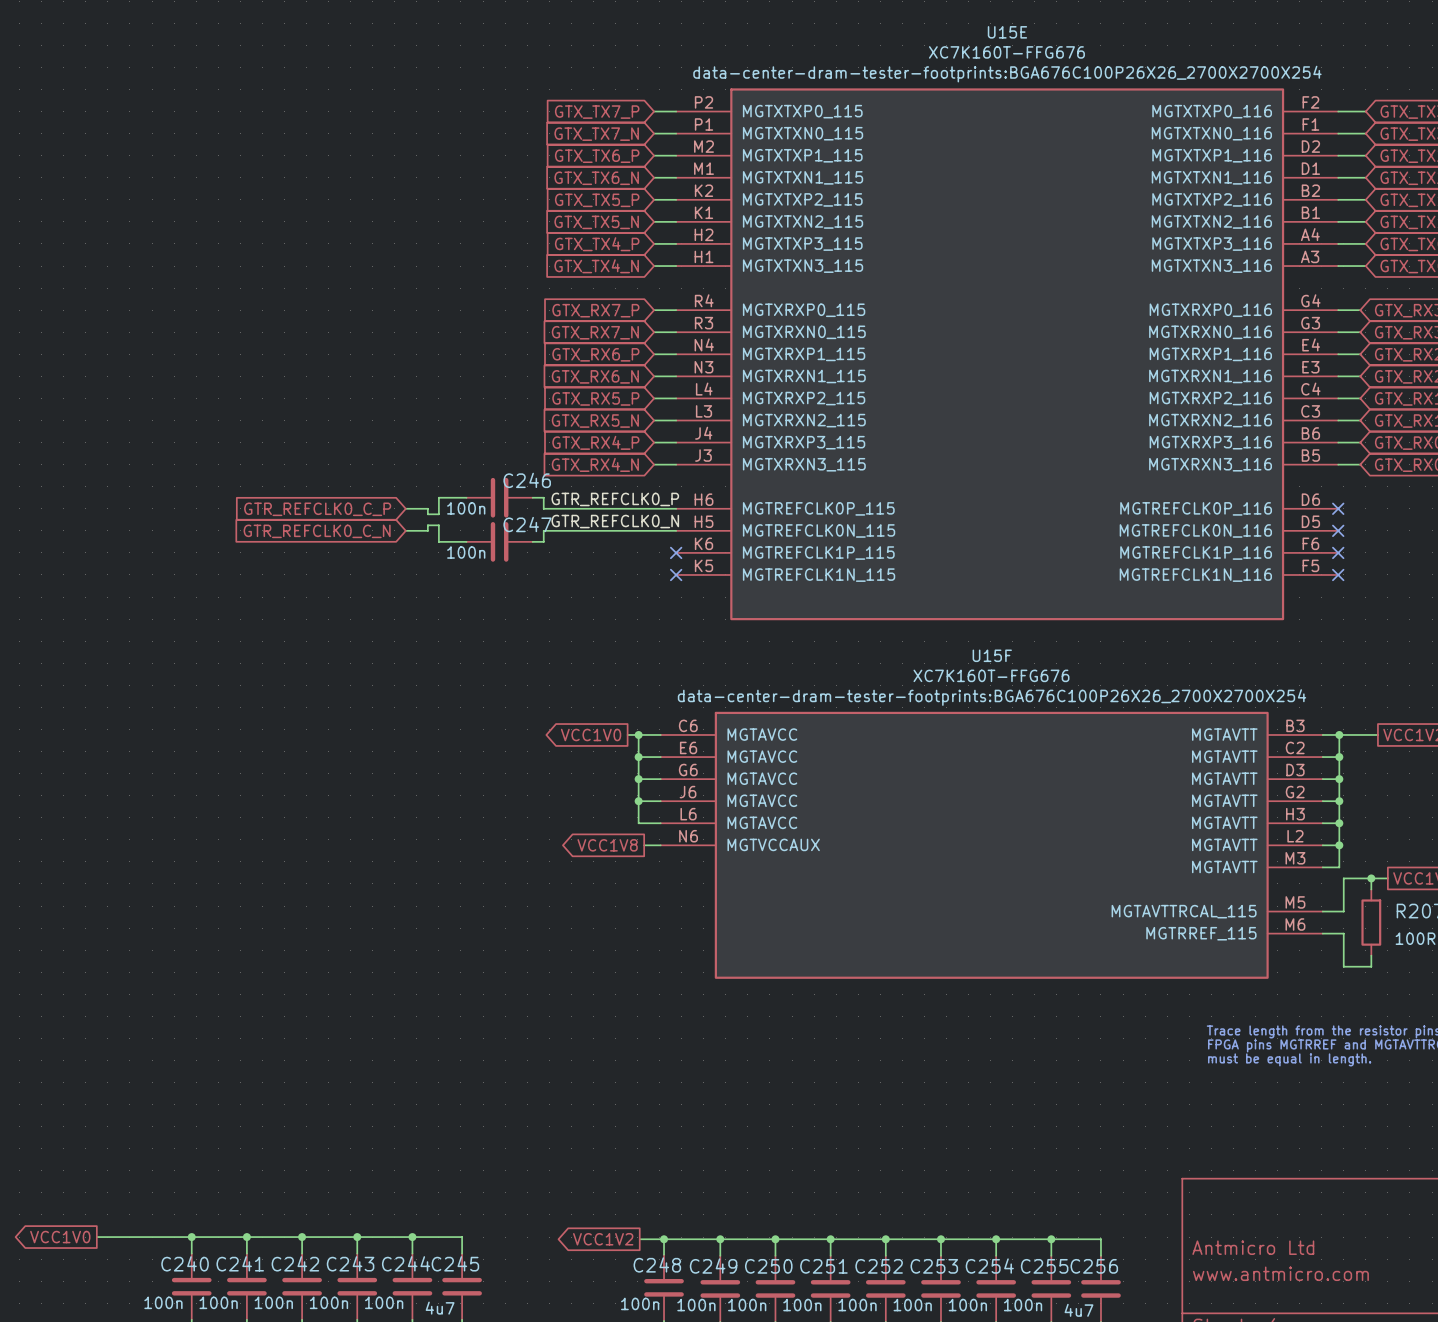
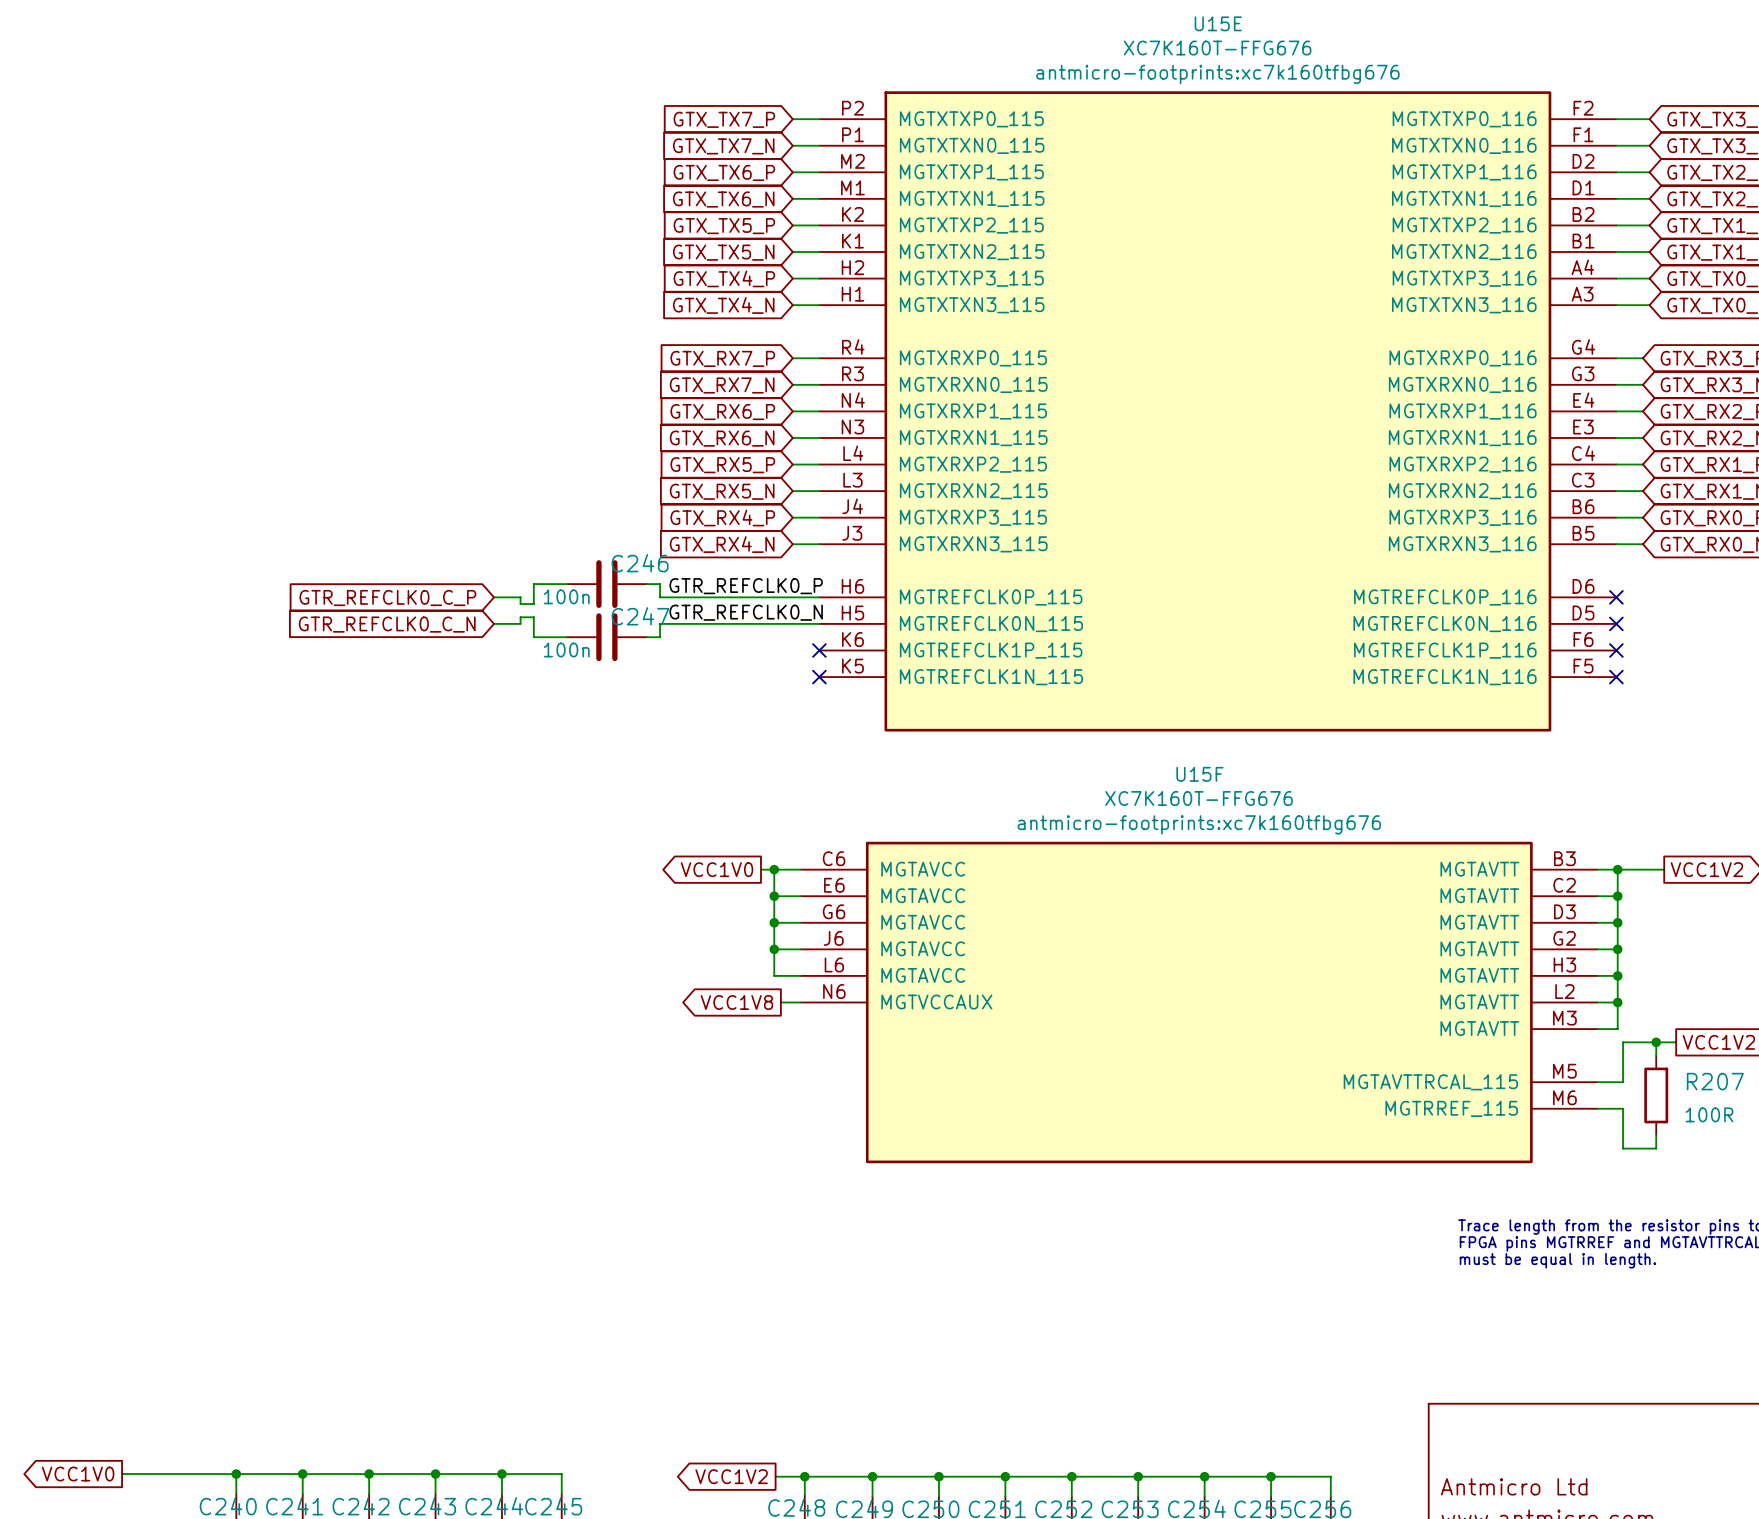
U15E text: data-center-dram-tester-footprints:BGA676C100P26X26_2700X2700X254 (1007, 74) -> antmicro-footprints:xc7k160tfbg676 (1217, 74)
U15F text: data-center-dram-tester-footprints:BGA676C100P26X26_2700X2700X254 (992, 697) -> antmicro-footprints:xc7k160tfbg676 (1199, 824)

